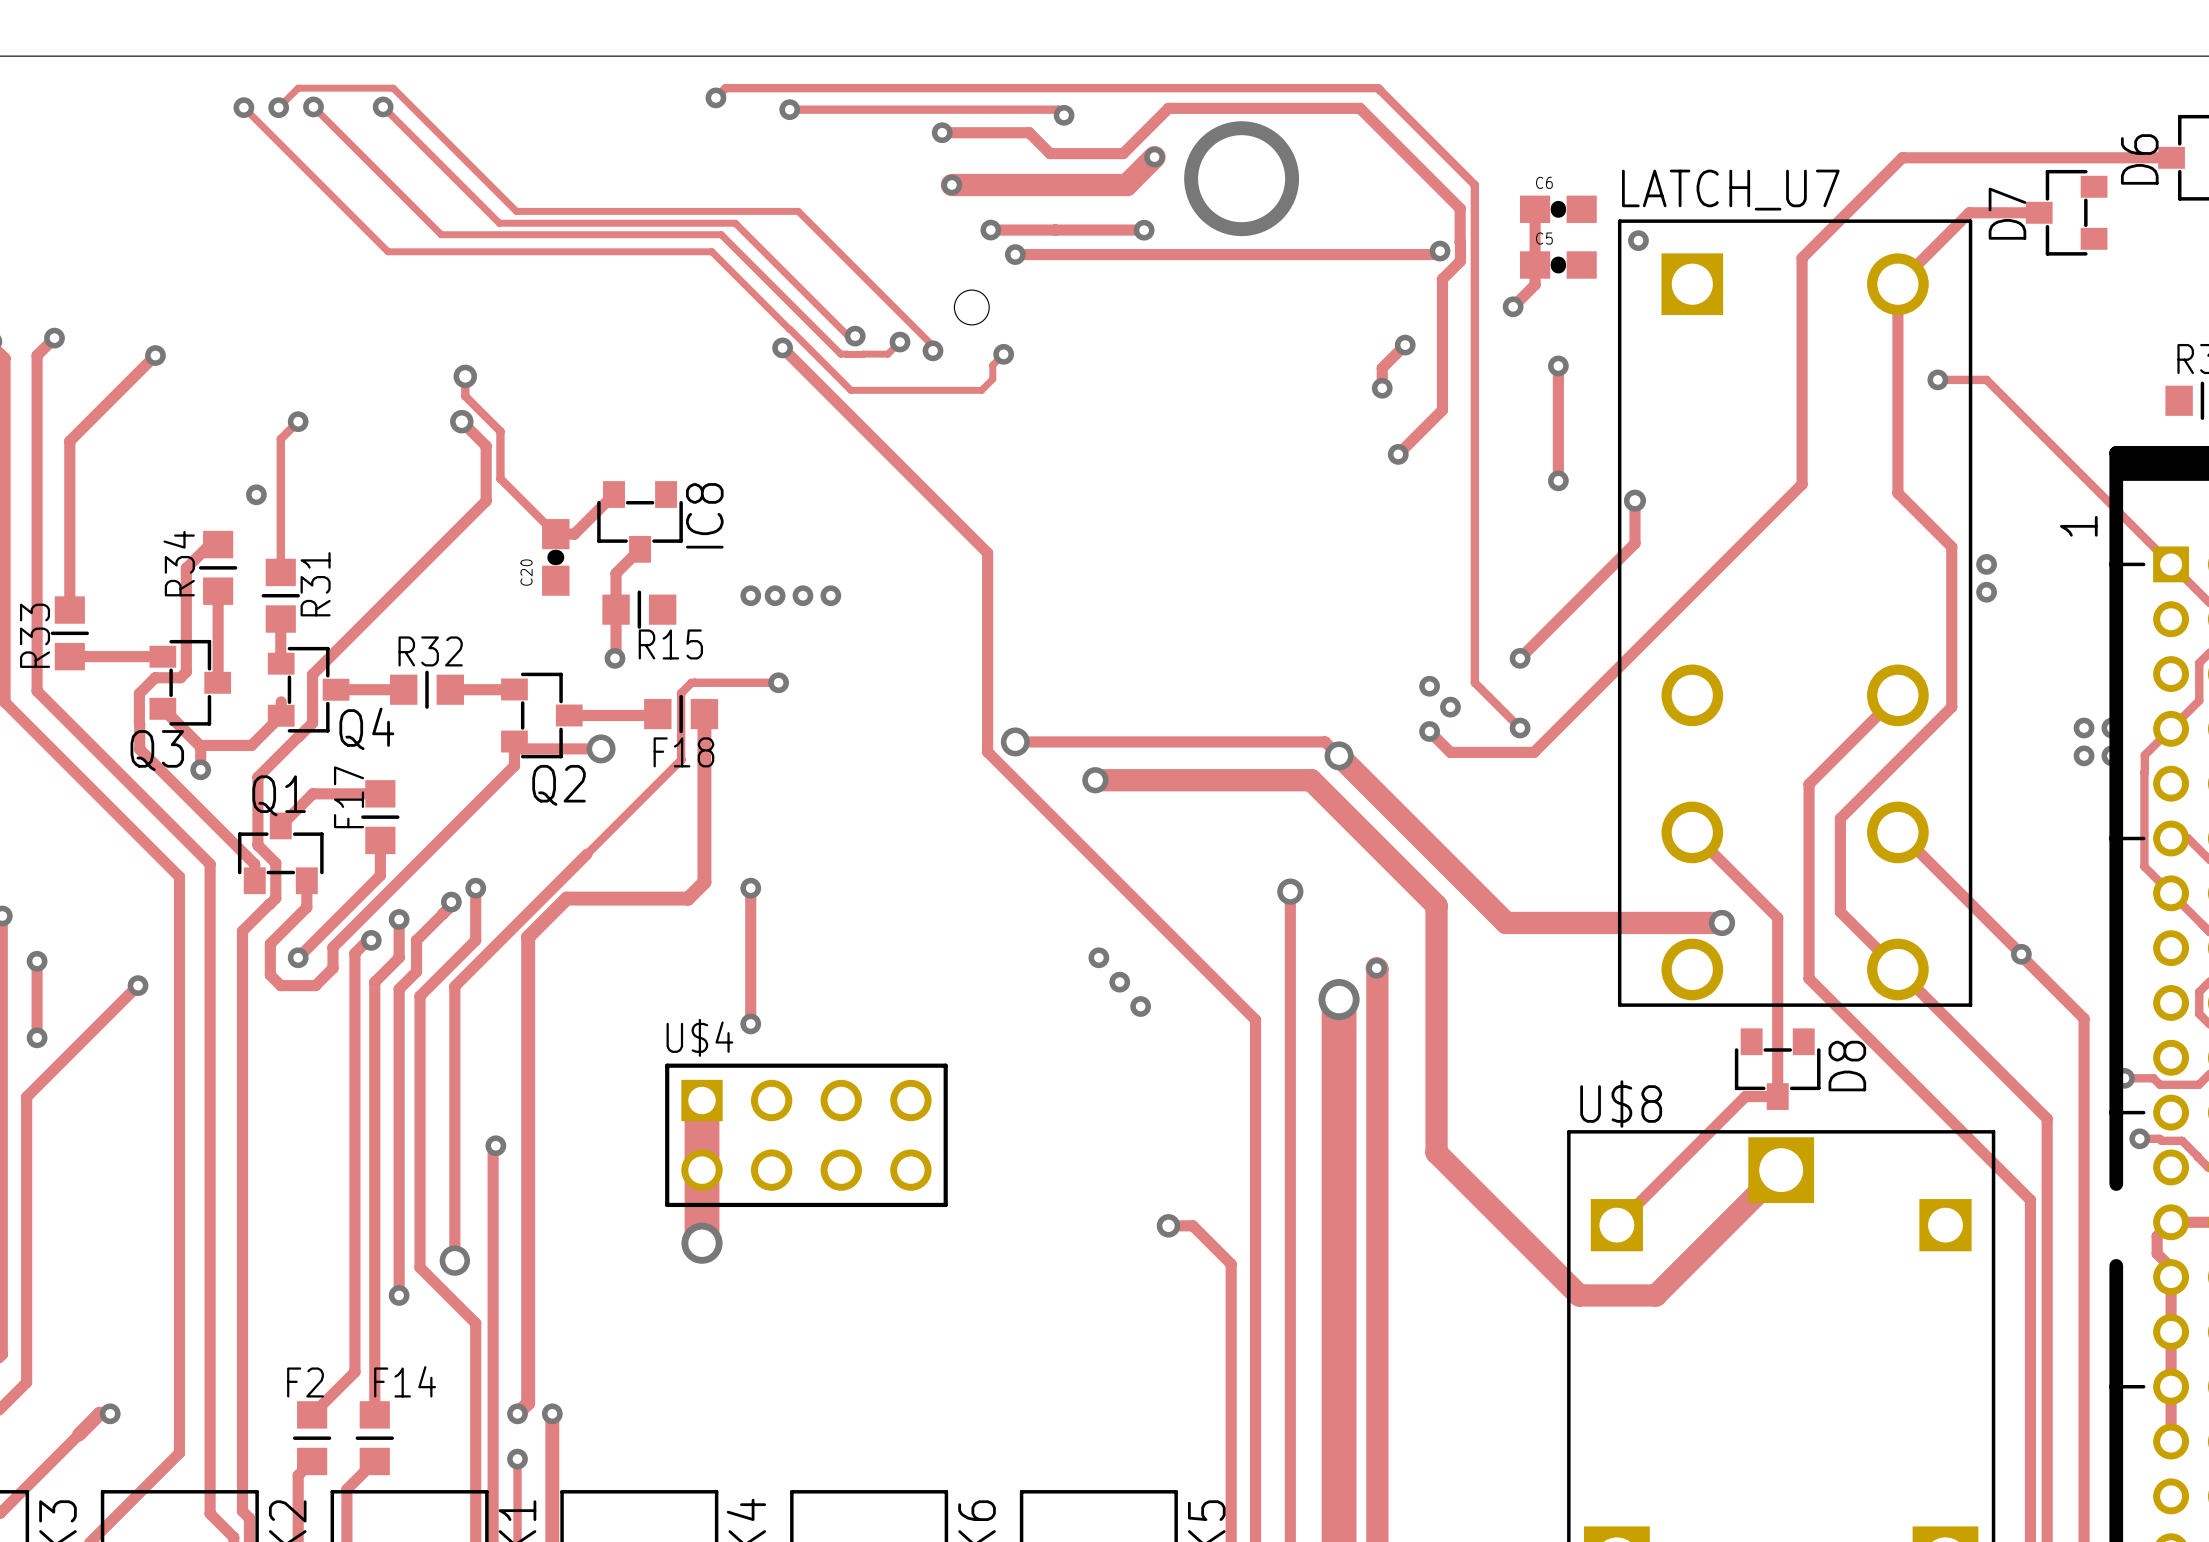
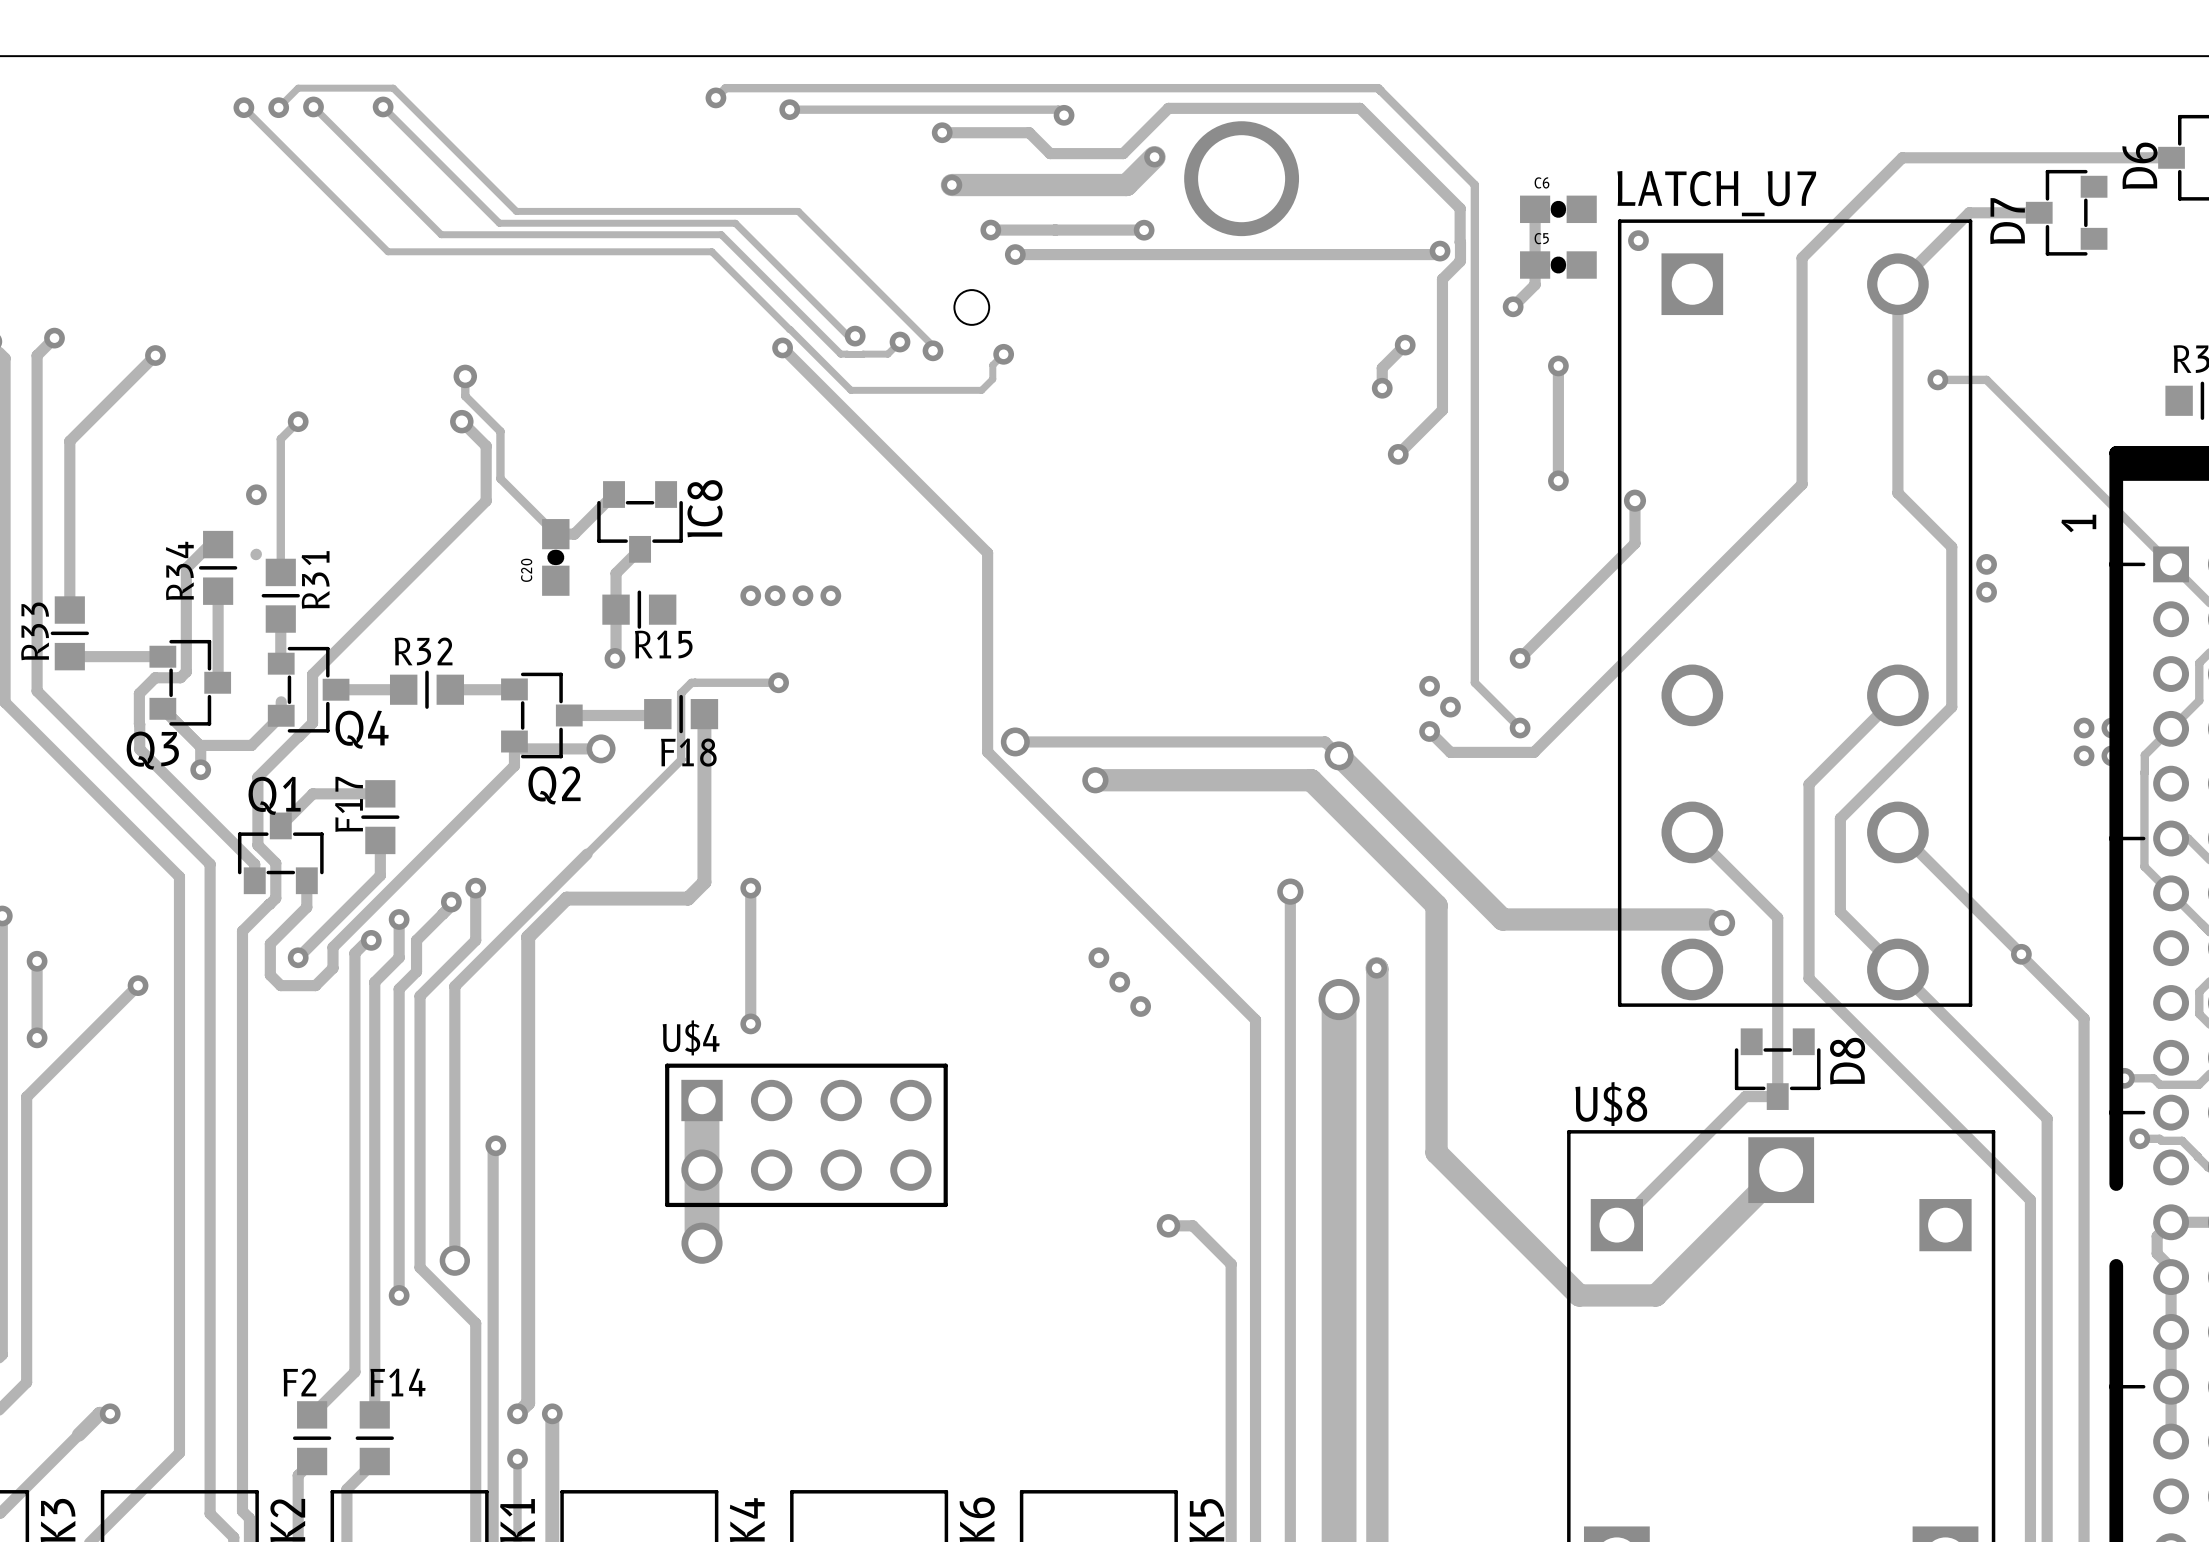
track: none -> (256, 554) (255, 554)
track: (1502, 919) (1506, 922) (1722, 922) -> (1502, 919) (1708, 919)

